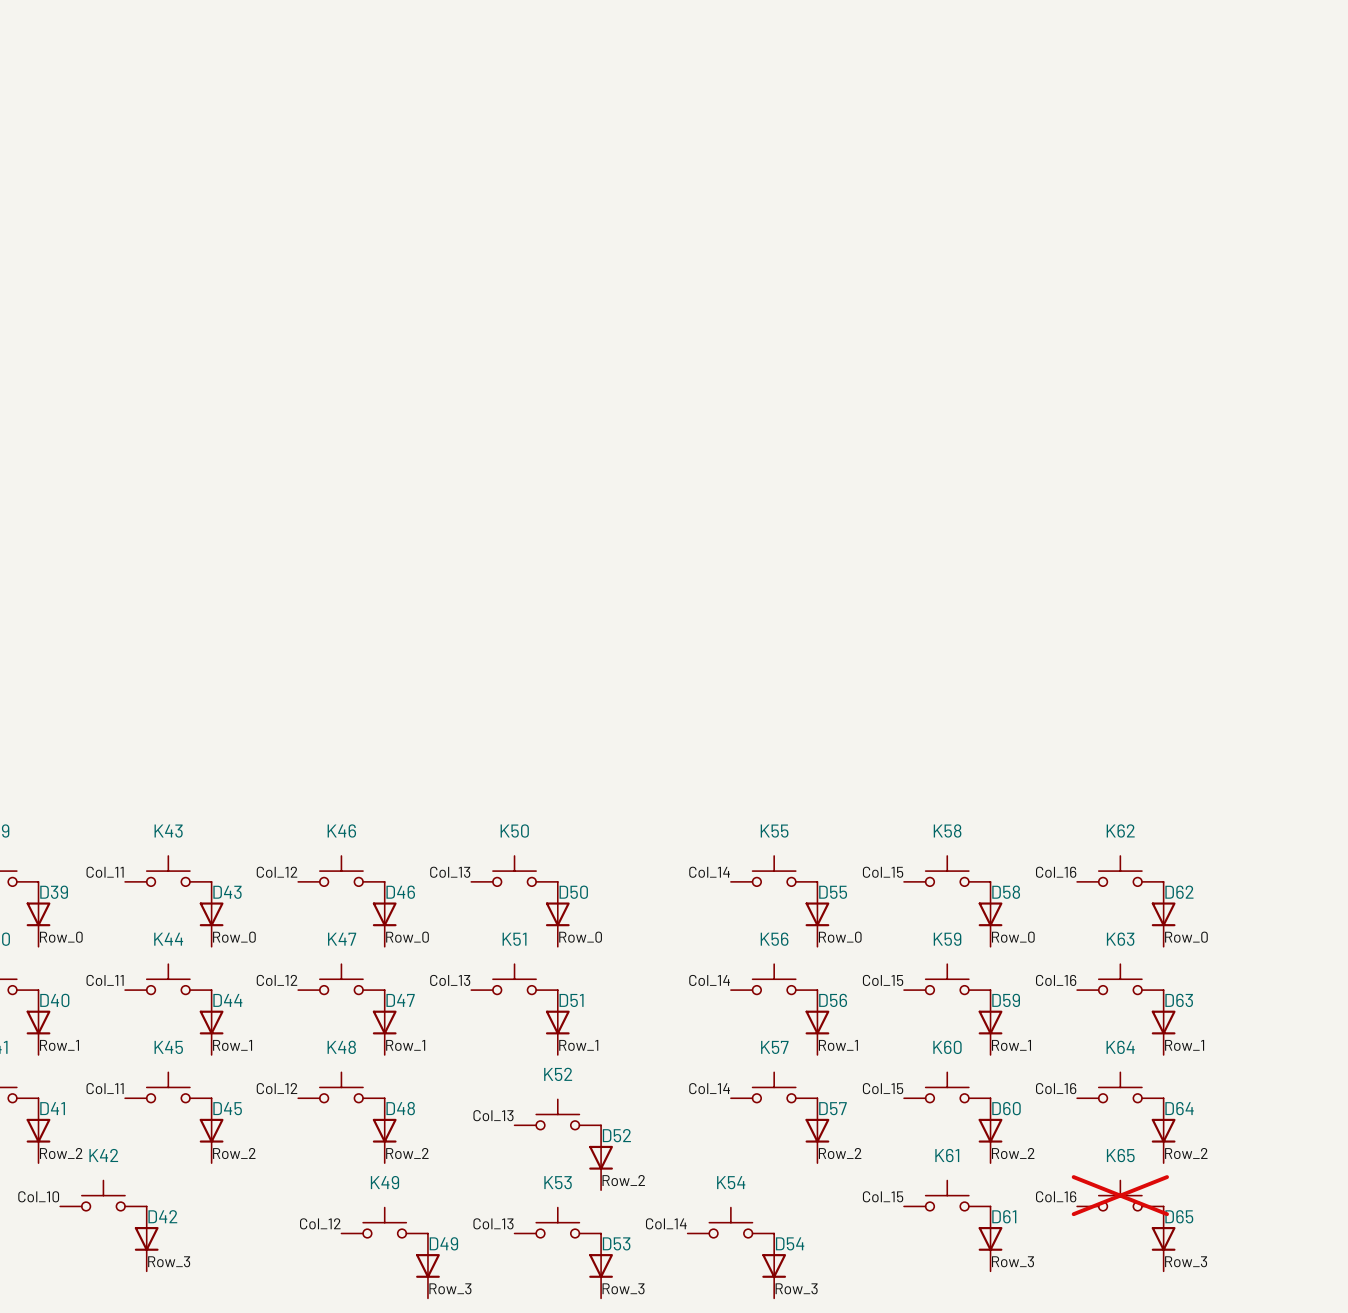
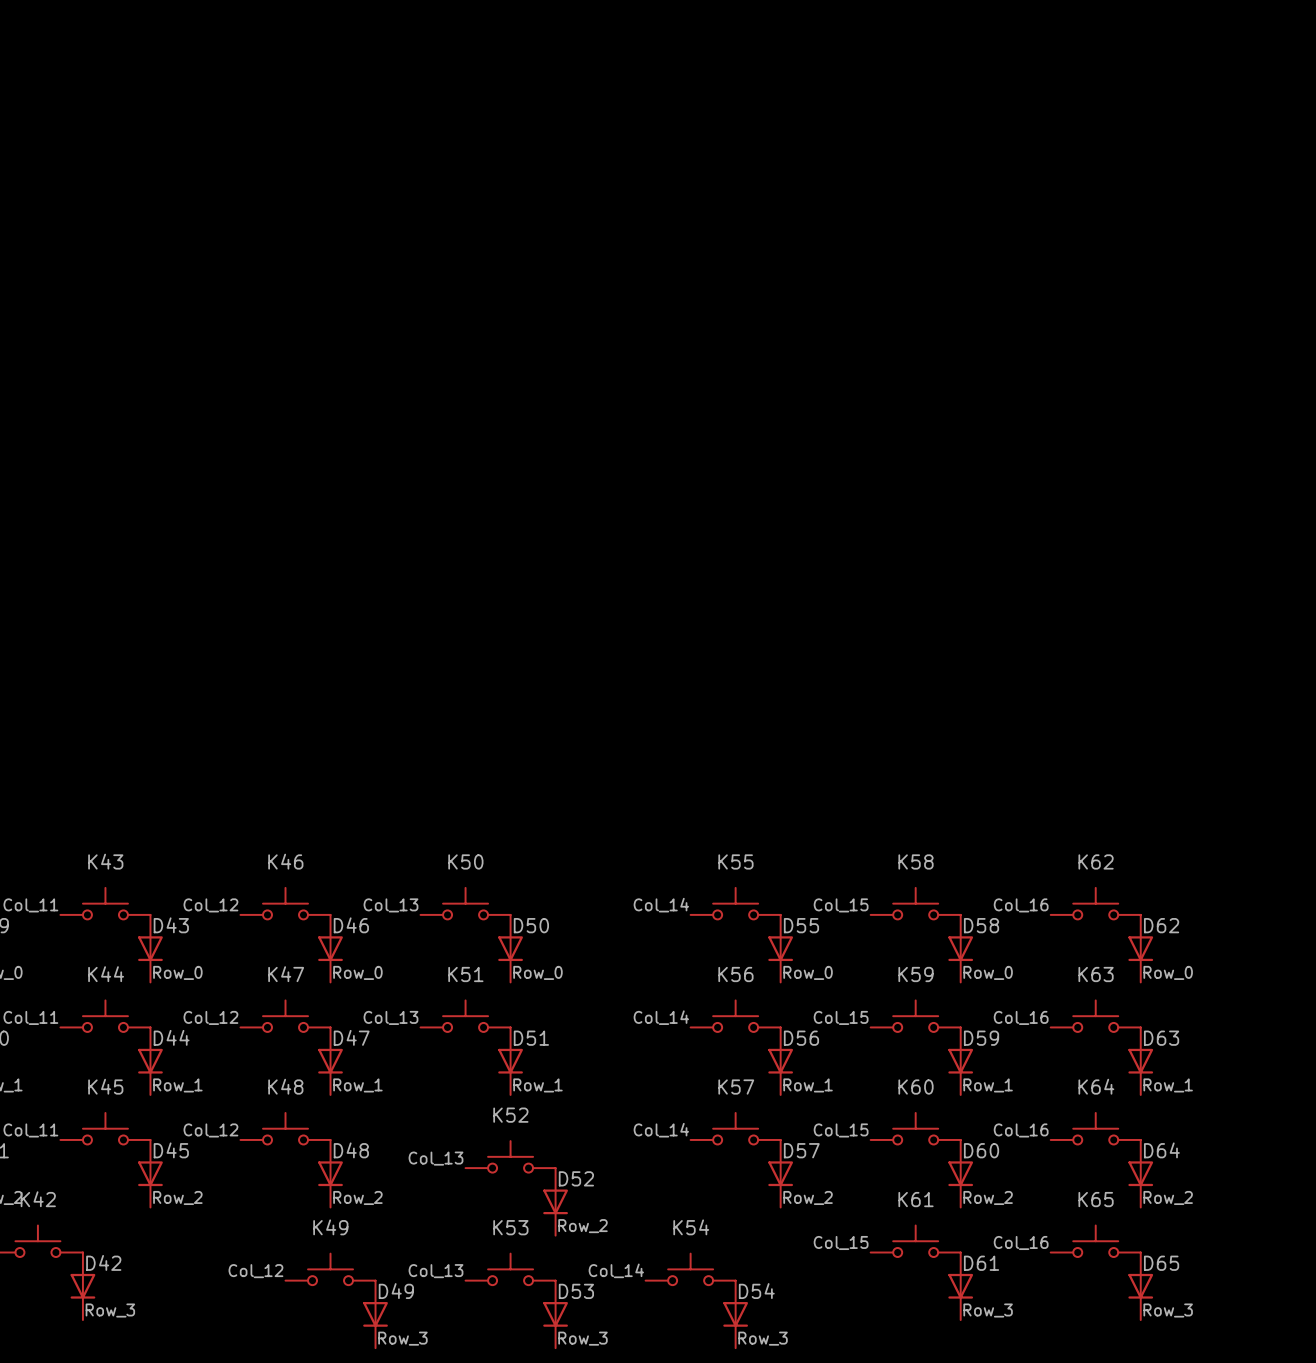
K65 do-not-place cross: (1120, 1195) -> none

